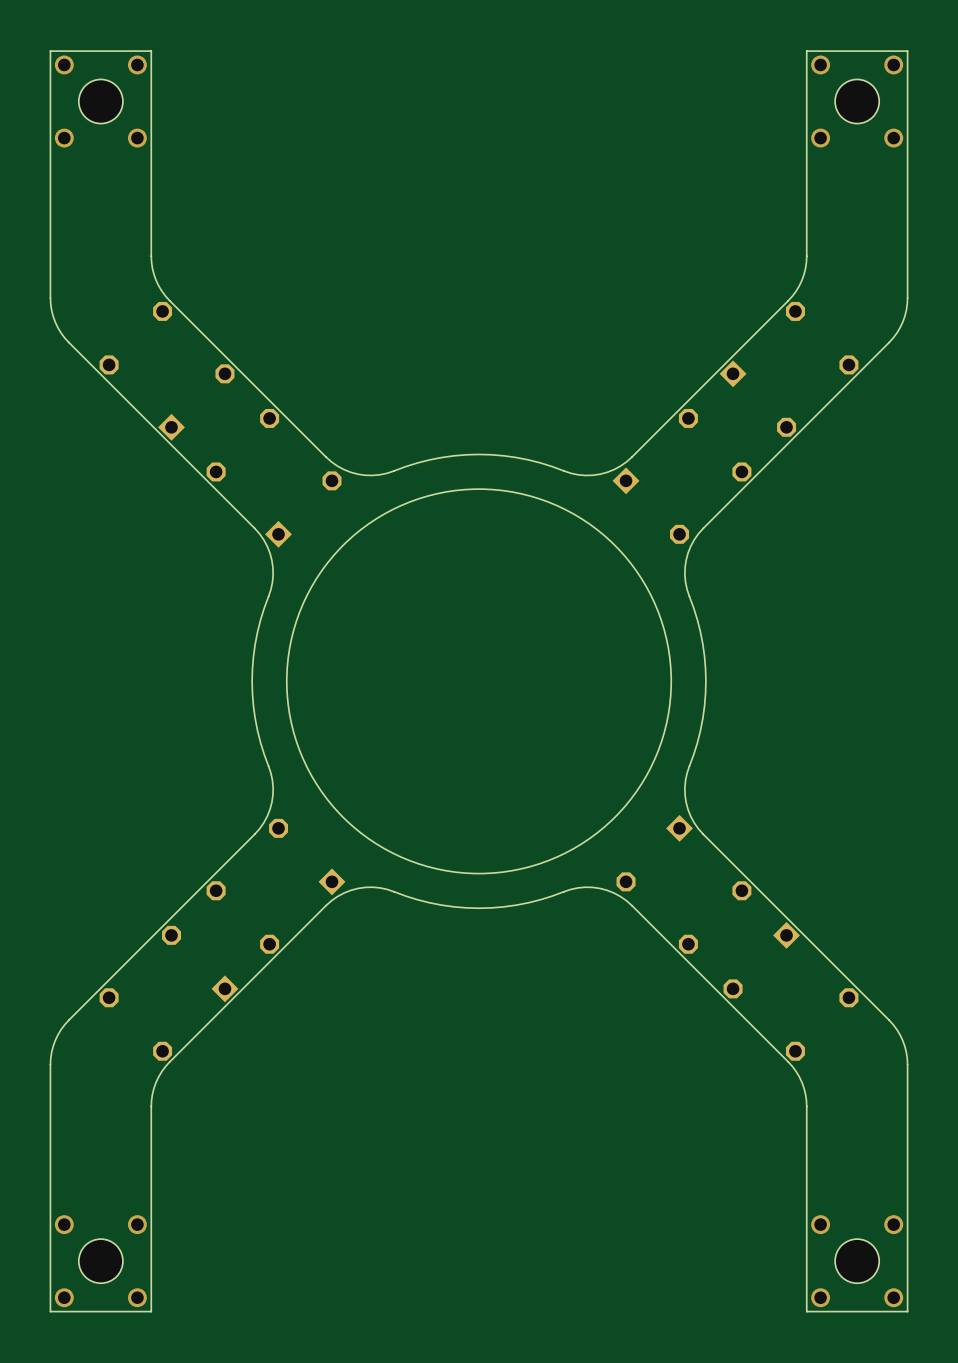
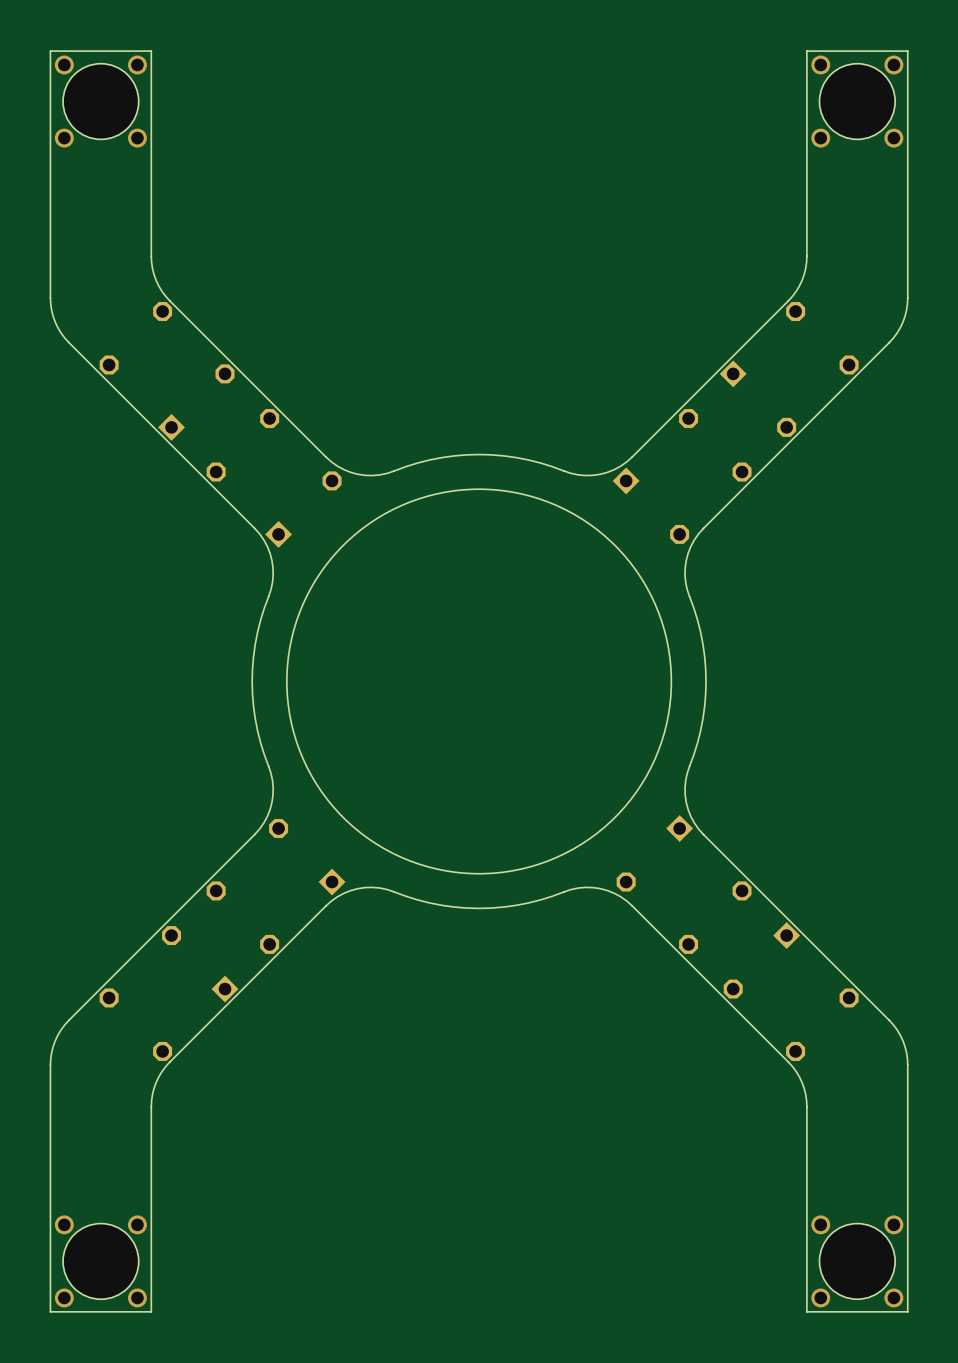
hole size: [78, 79, 123, 124] -> [63, 63, 139, 140]
hole size: [835, 79, 880, 124] -> [819, 63, 896, 140]
hole size: [78, 1239, 123, 1284] -> [63, 1223, 139, 1300]
hole size: [835, 1239, 880, 1284] -> [819, 1223, 896, 1300]

